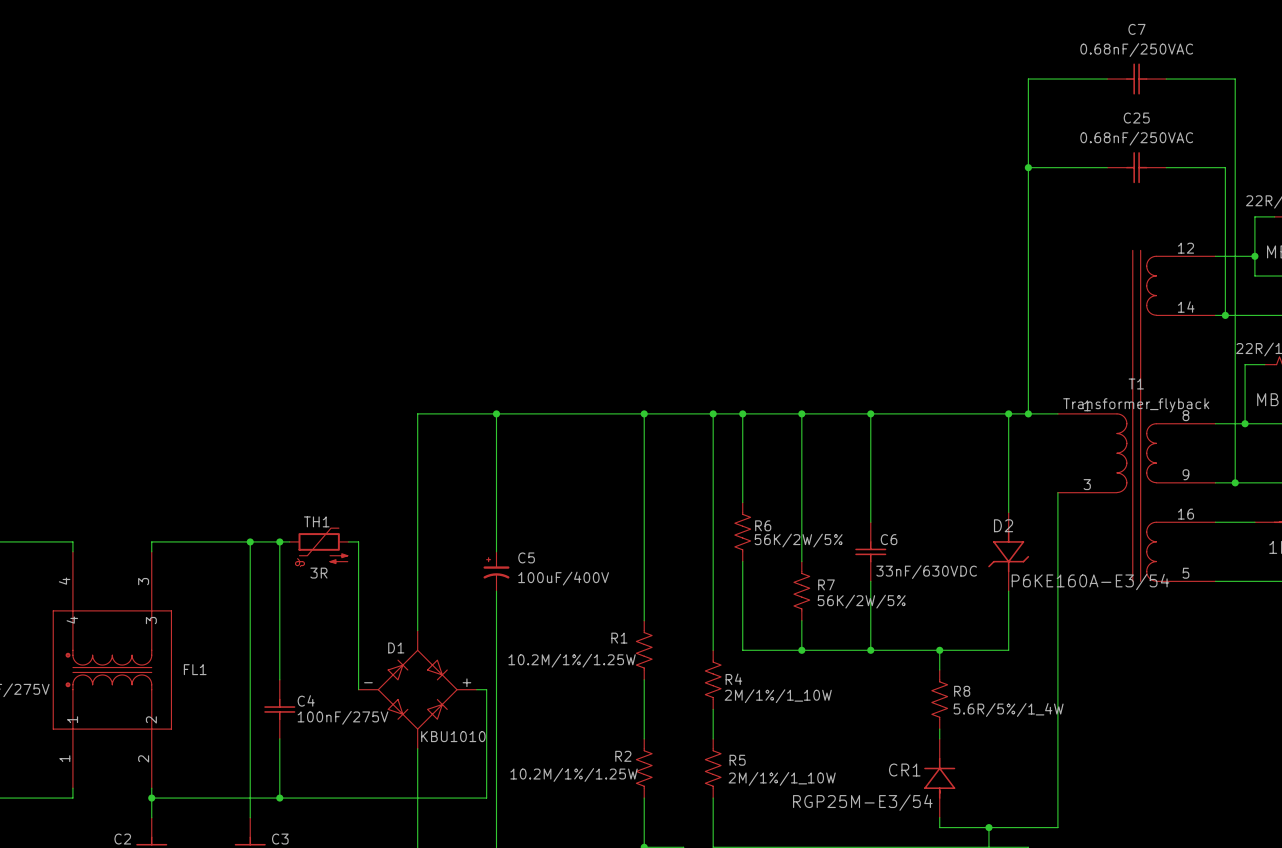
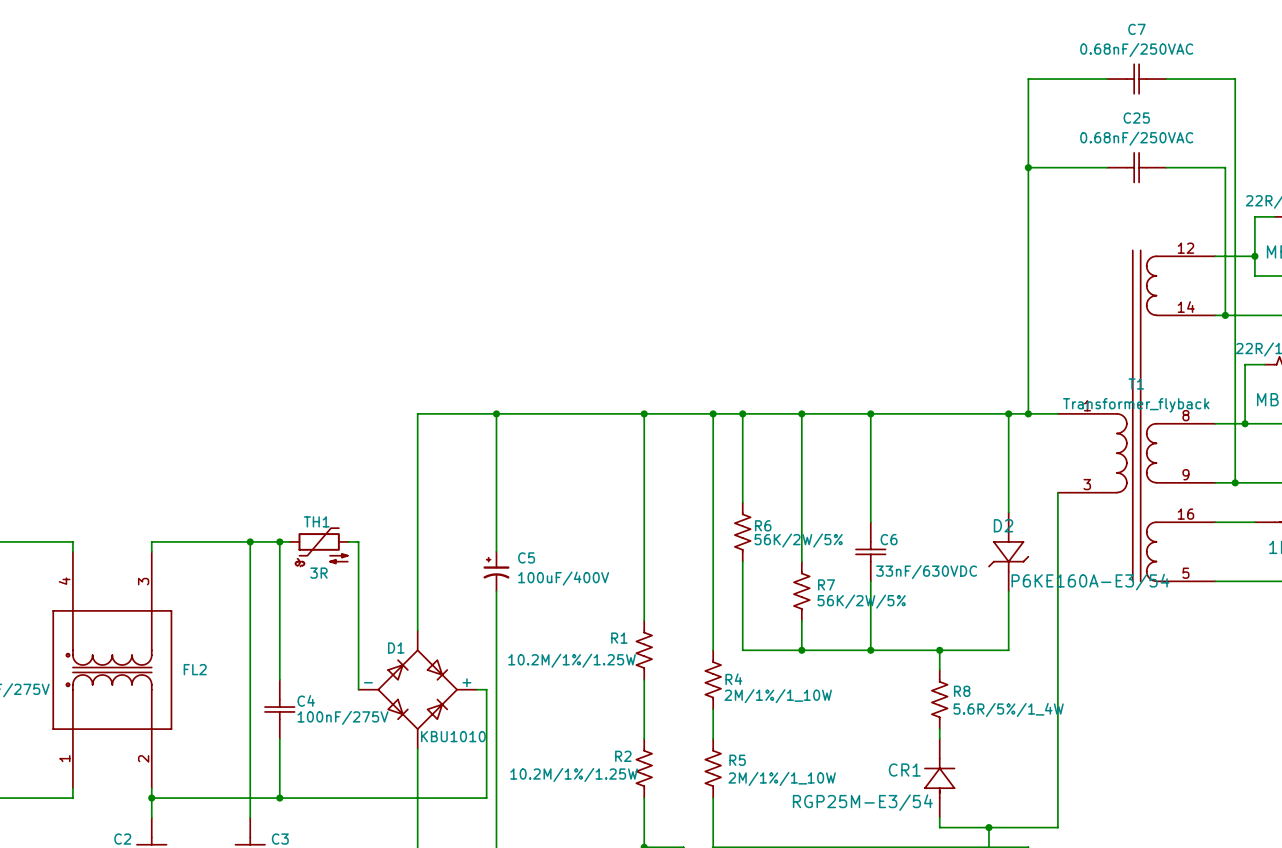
FL1 pin name: 4 (72, 620) -> none
FL1 pin name: 3 (151, 620) -> none
FL1 name: FL1 (195, 669) -> FL2 (195, 669)
FL1 pin name: 1 (72, 719) -> none
FL1 pin name: 2 (151, 719) -> none

